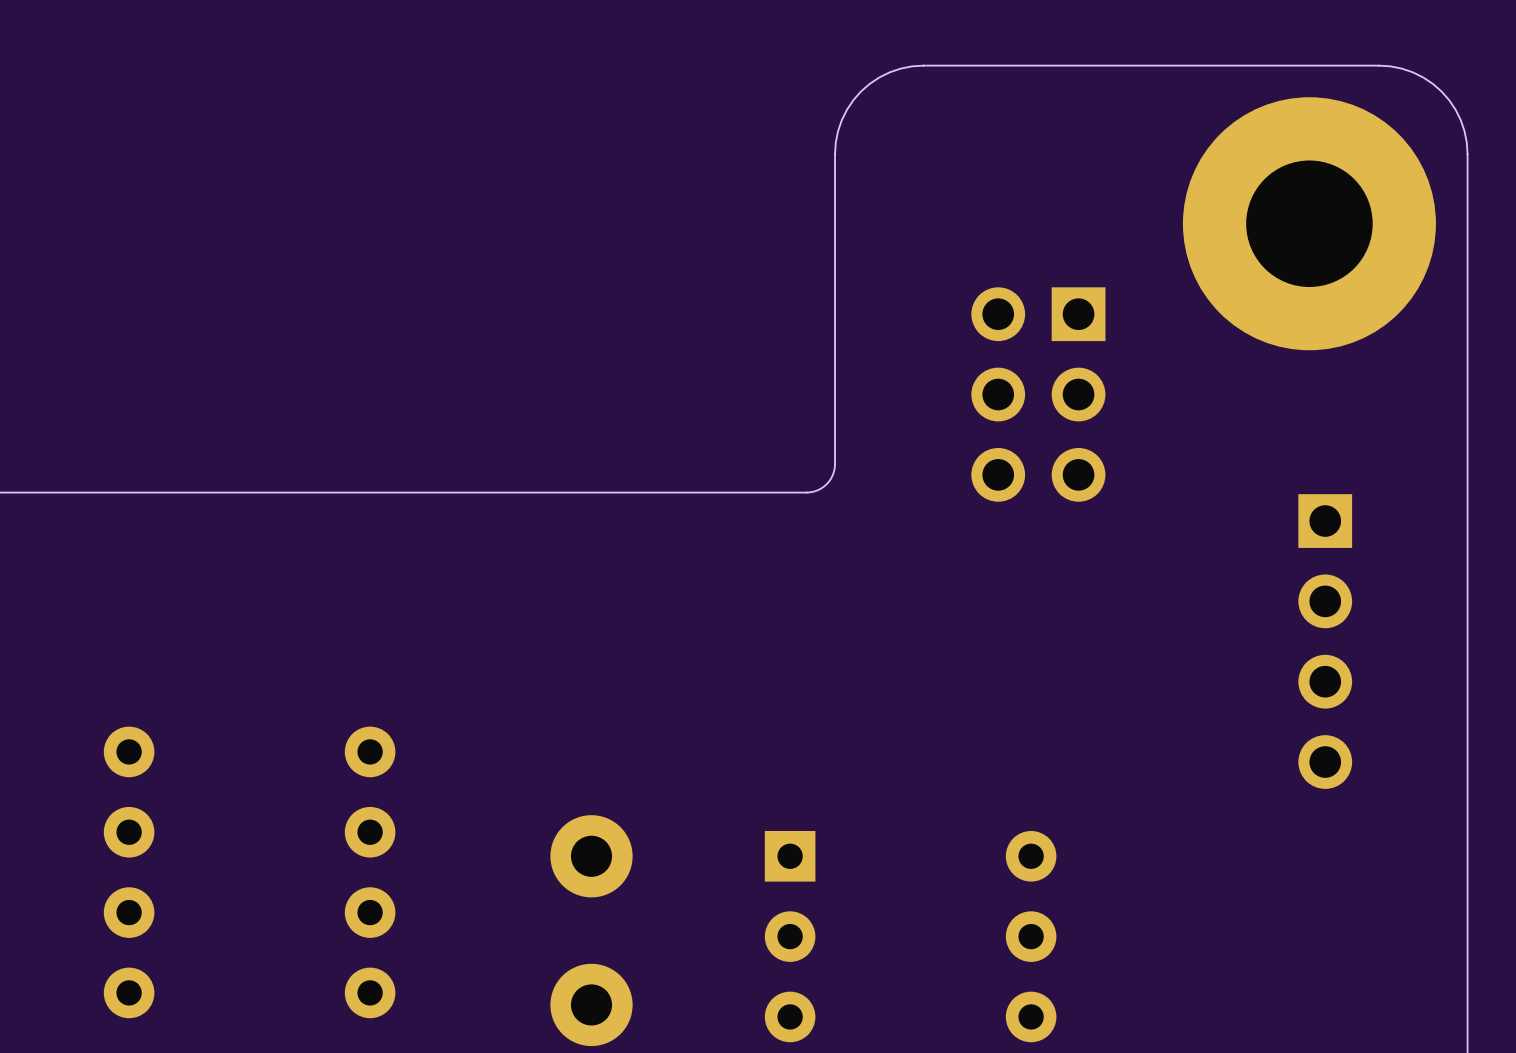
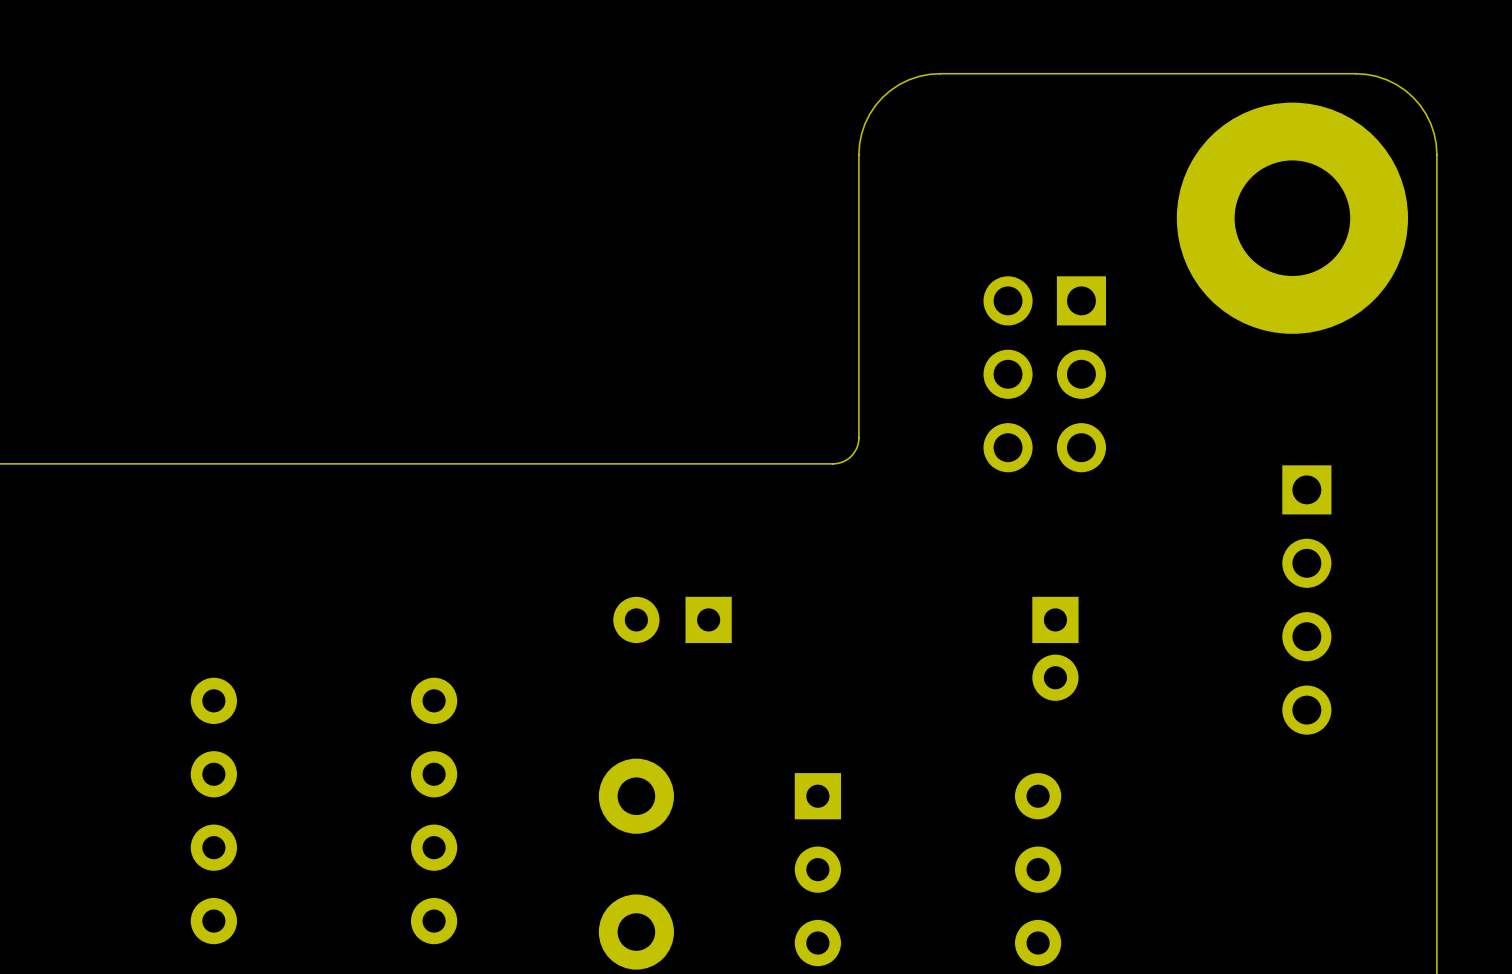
part: none -> (672, 619)
part: none -> (1055, 648)

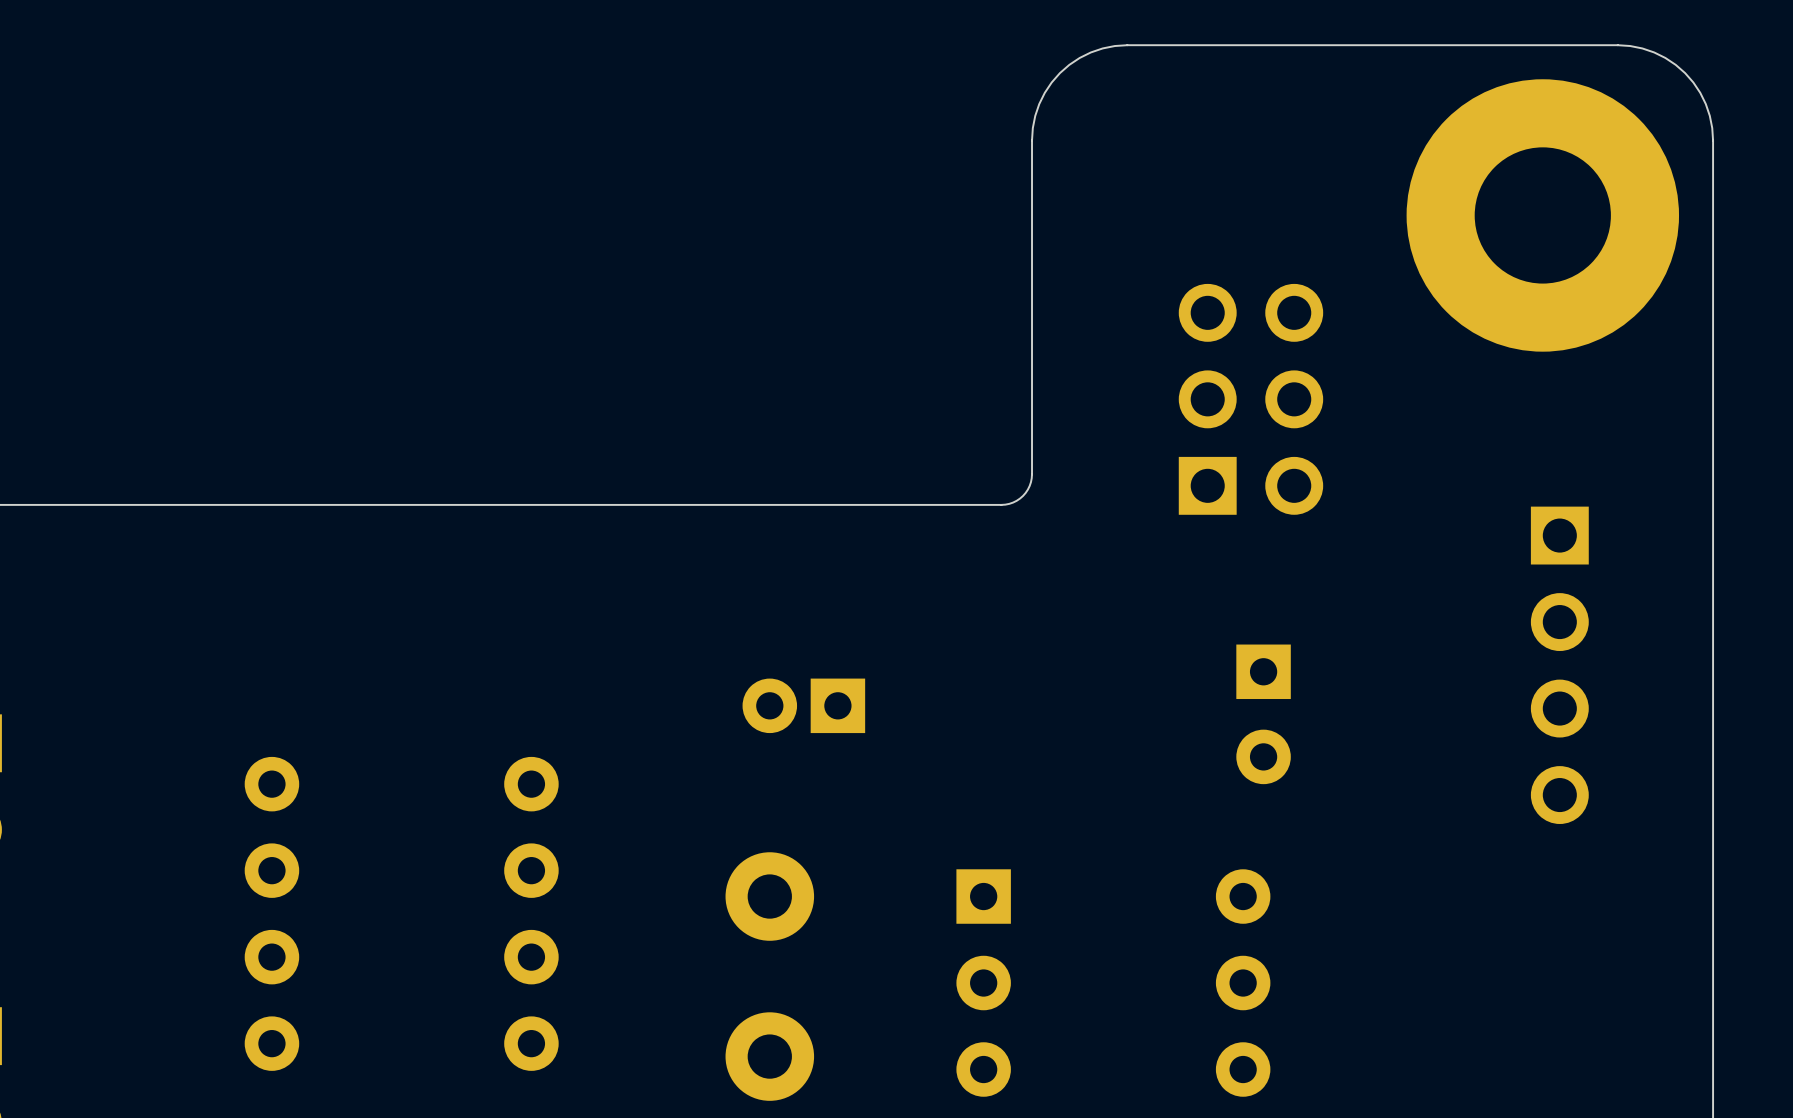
part rotation: 0° (1044, 374) -> 180° (1250, 399)
part footprint: [613, 596, 732, 644] -> [742, 678, 866, 734]
part footprint: [1032, 596, 1079, 701] -> [1236, 644, 1291, 785]

